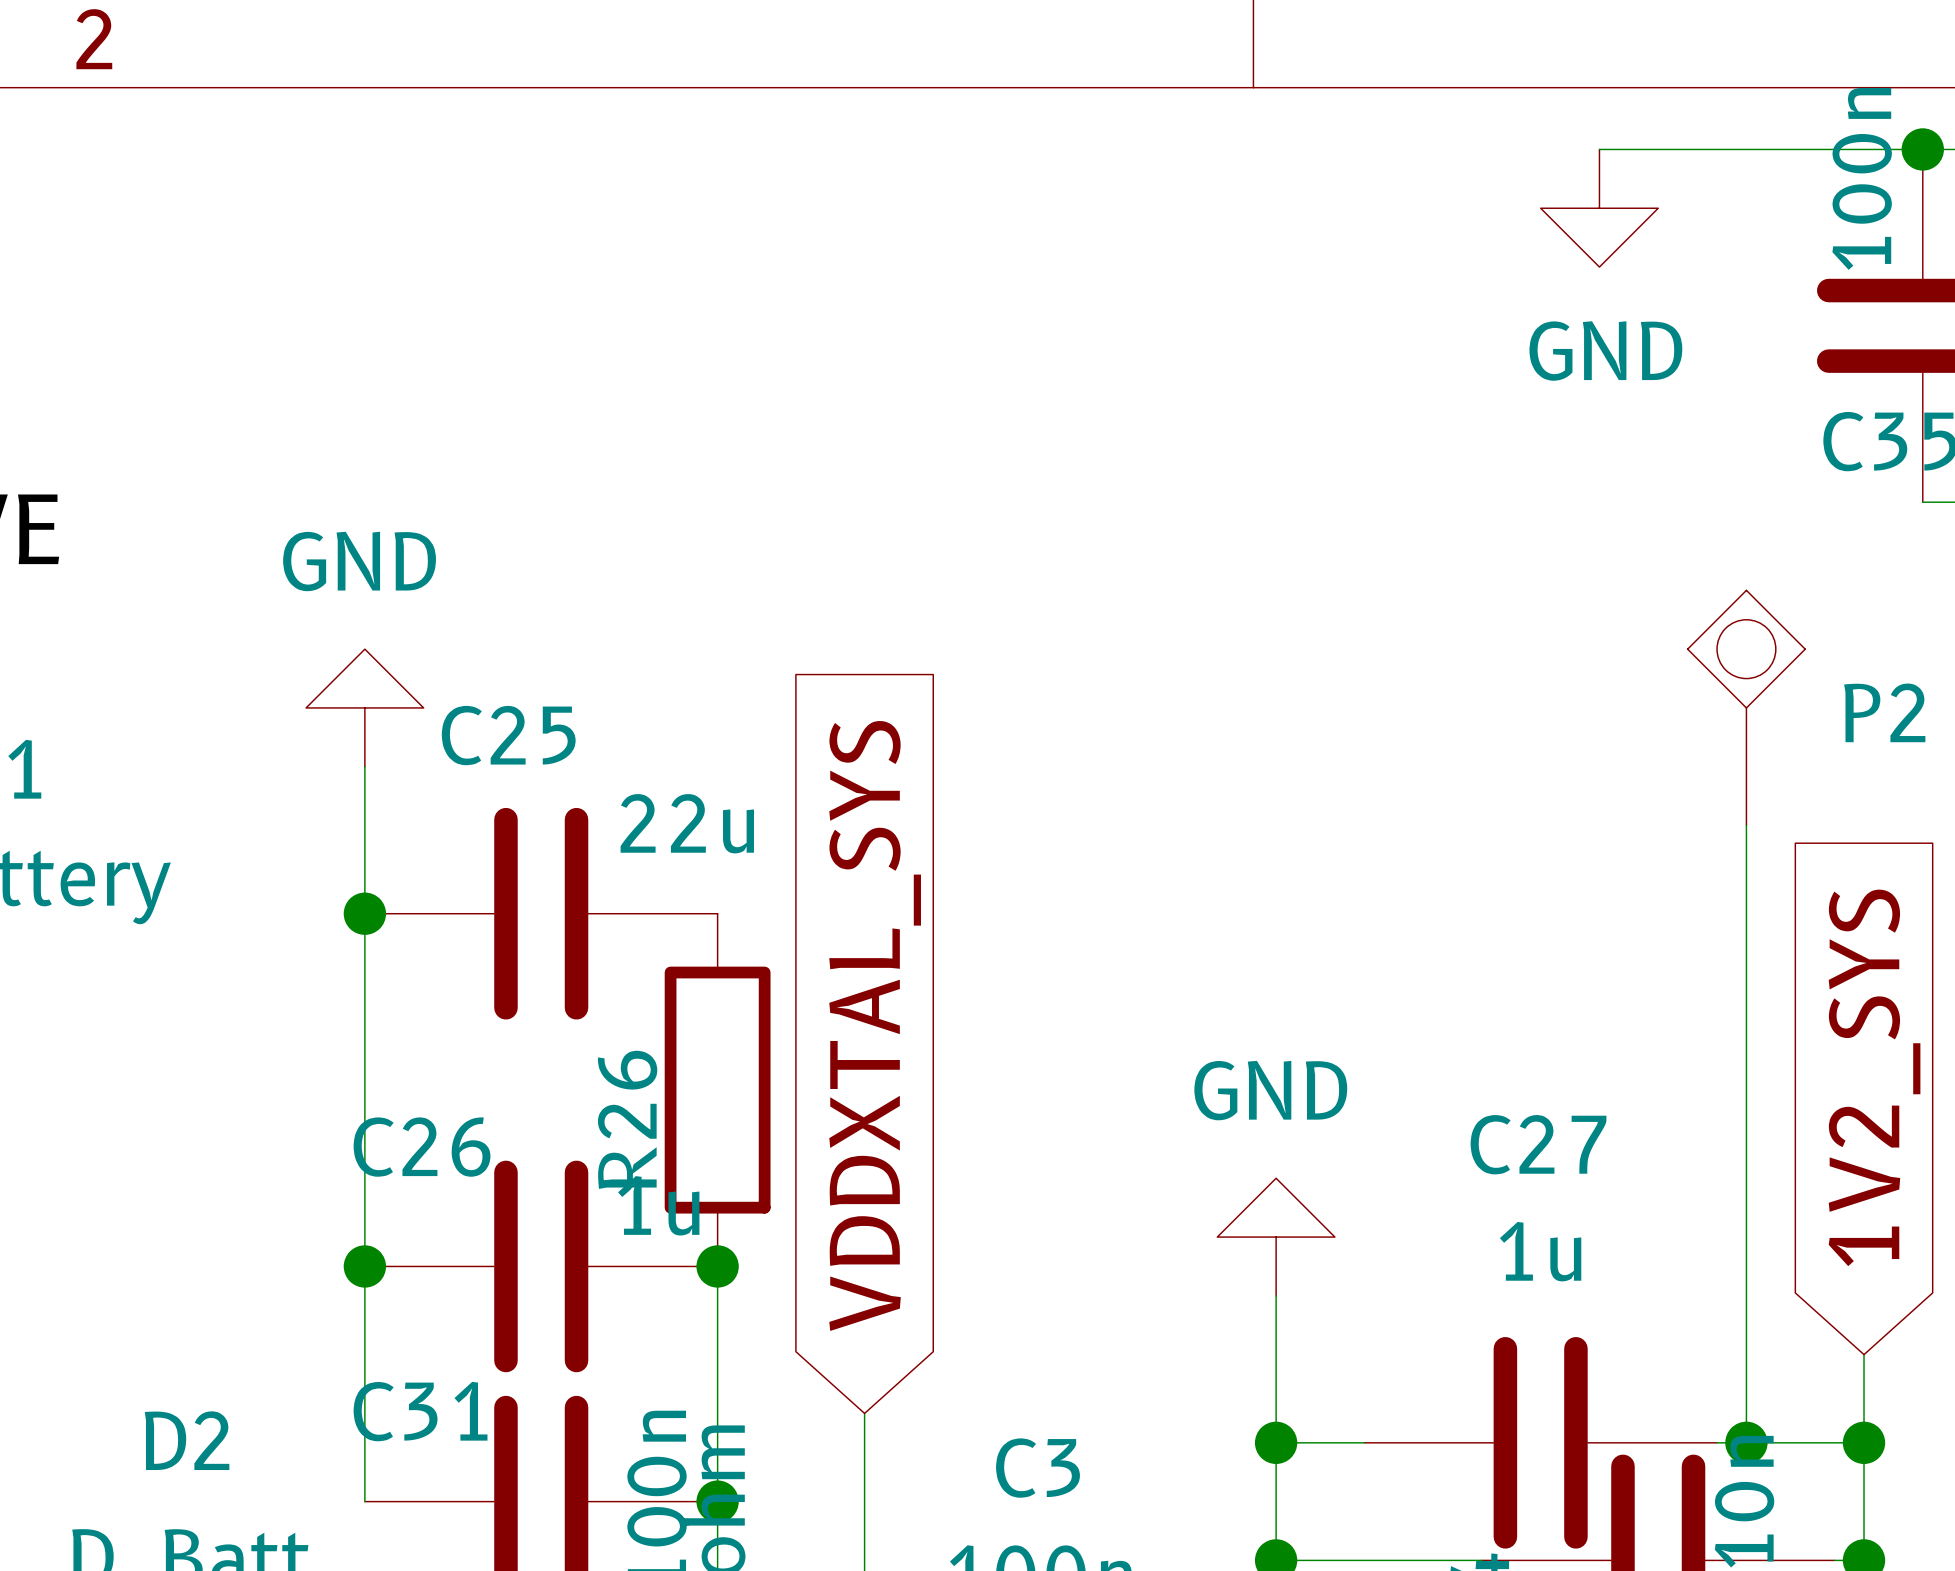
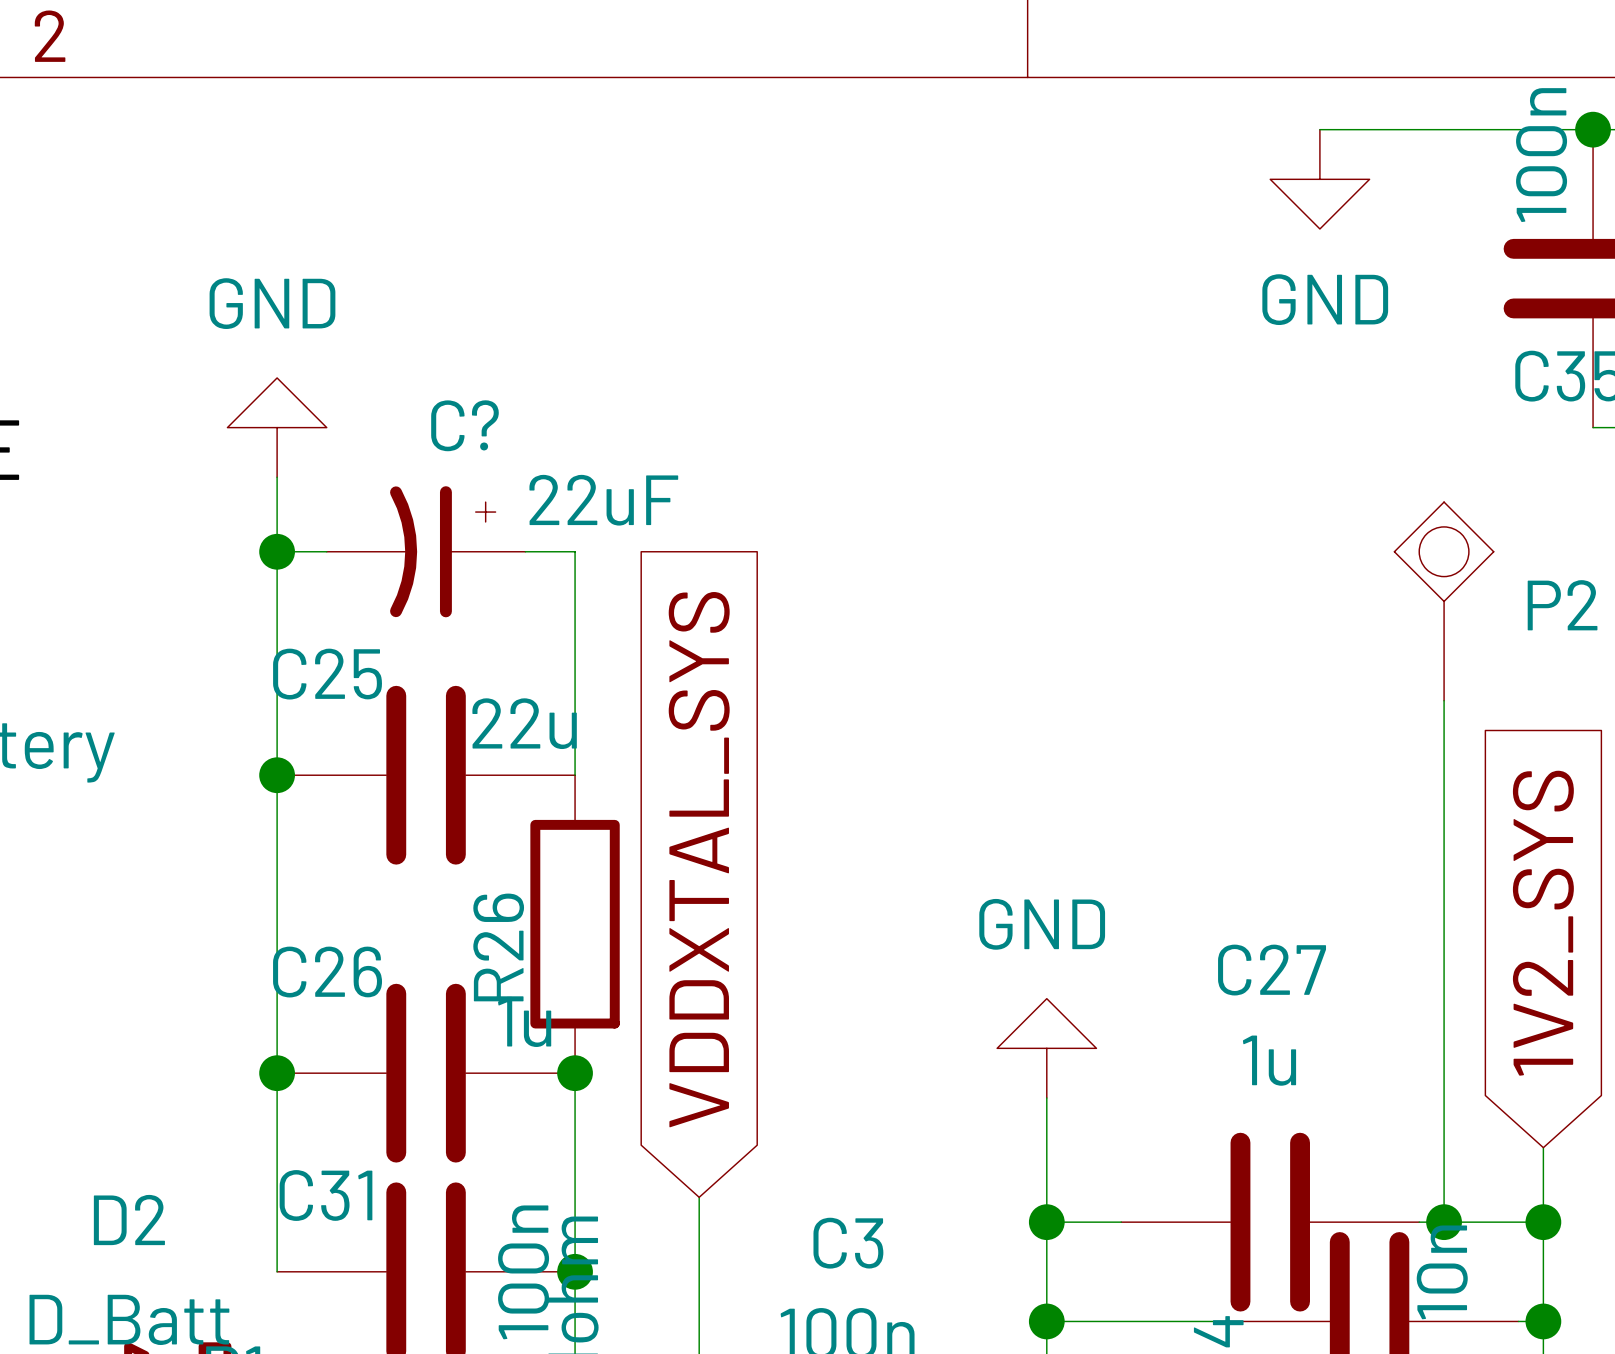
wire: none -> (277, 477) (277, 651)
wire: none -> (277, 551) (326, 551)
junction: none -> (277, 551)
C?: none -> 22uF (426, 551)
wire: none -> (525, 551) (575, 551) (575, 775)
power symbol position: GND (364, 707) -> GND (277, 427)
C25 name position: C25 (508, 735) -> C25 (327, 674)
C25 value position: 22u (687, 823) -> 22u (524, 723)

